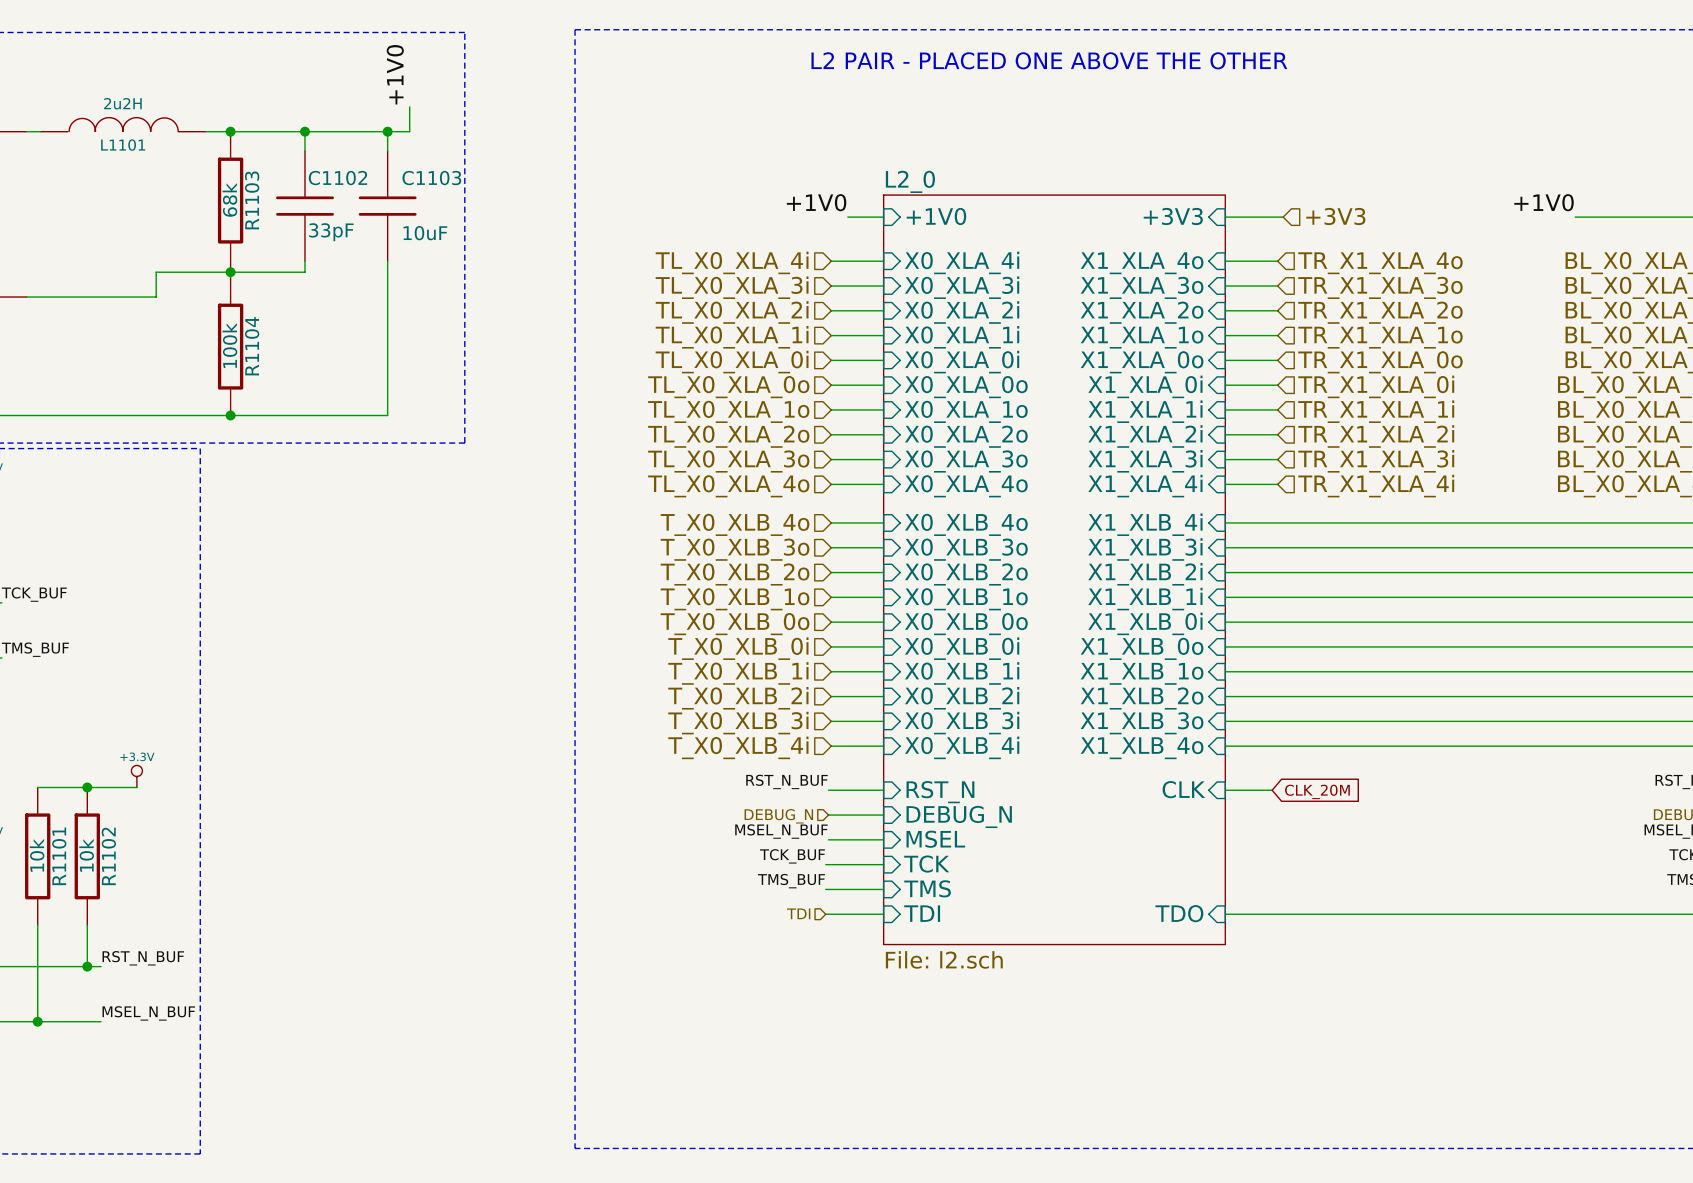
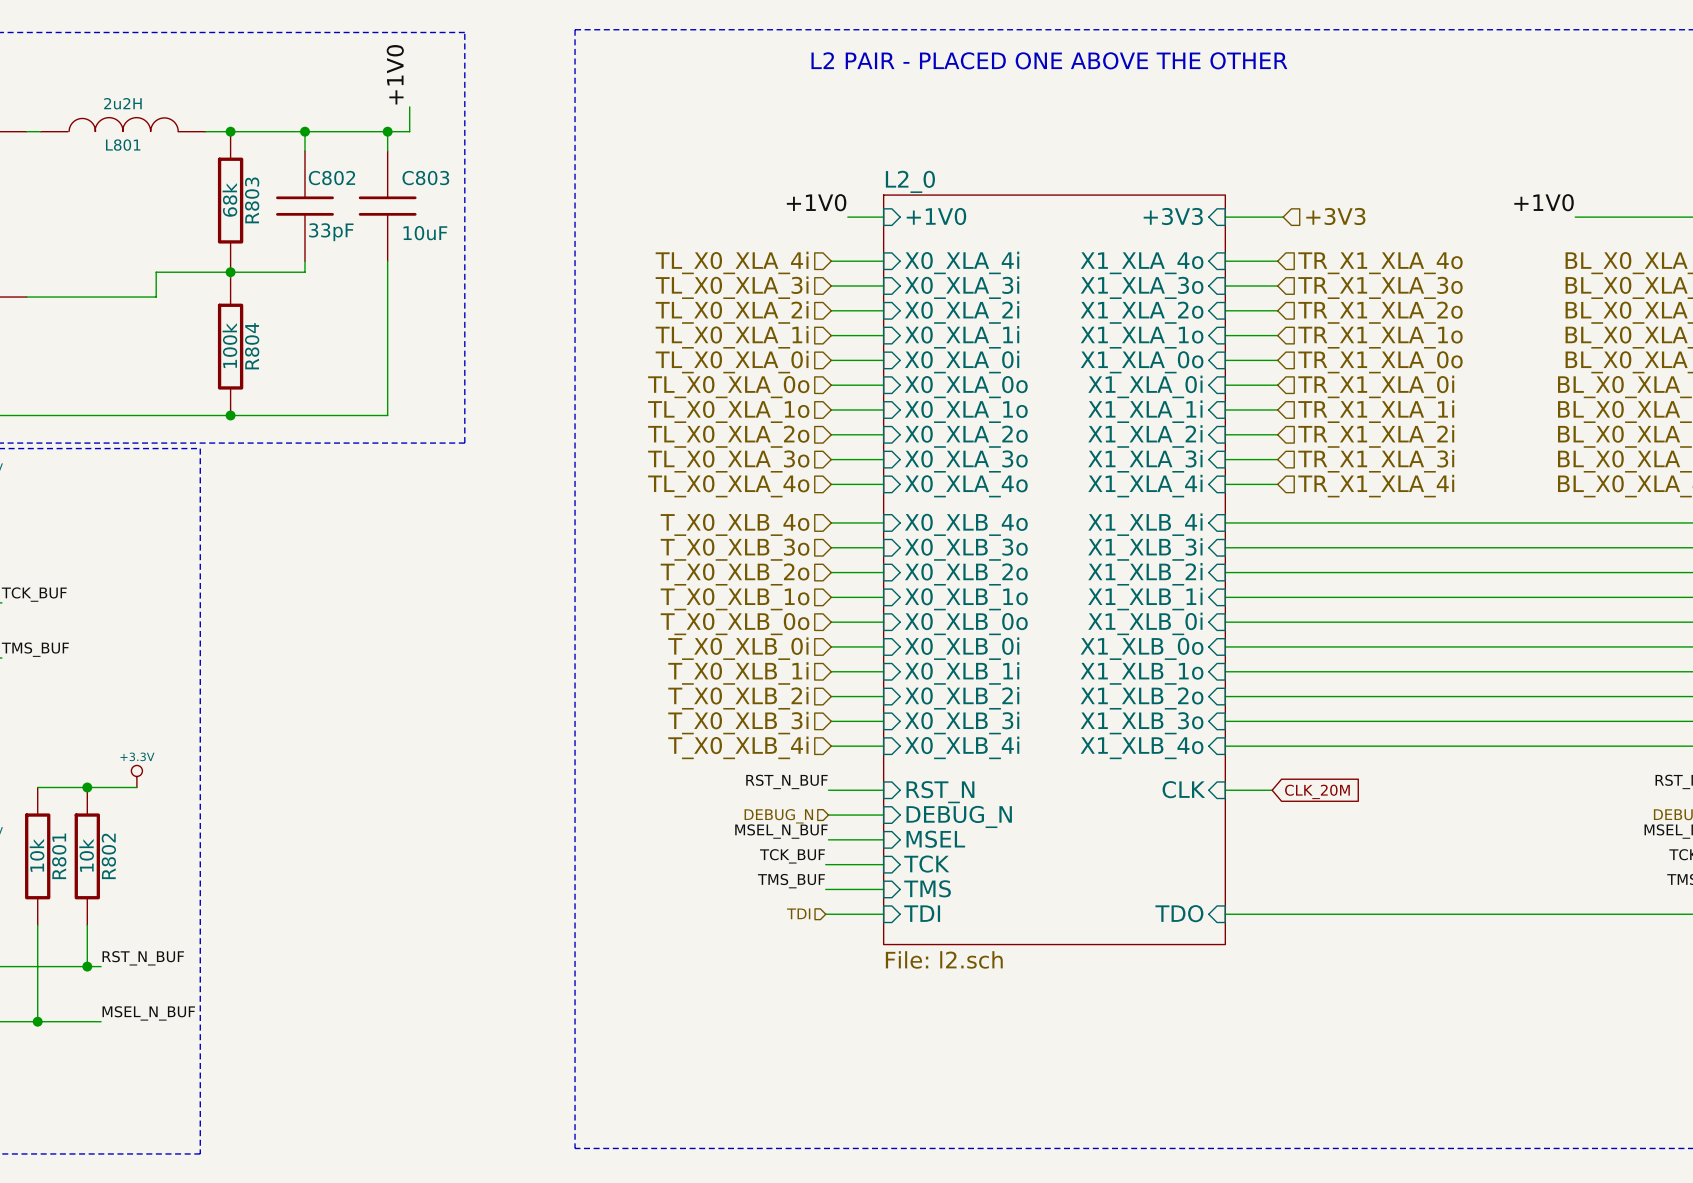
L1101 name: L1101 (123, 145) -> L801 (123, 145)
C1102 name: C1102 (337, 178) -> C802 (331, 178)
C1103 name: C1103 (431, 178) -> C803 (425, 178)
R1103 name: R1103 (252, 200) -> R803 (252, 200)
R1104 name: R1104 (252, 346) -> R804 (252, 346)
R1101 name: R1101 (59, 856) -> R801 (59, 856)
R1102 name: R1102 (108, 856) -> R802 (108, 856)

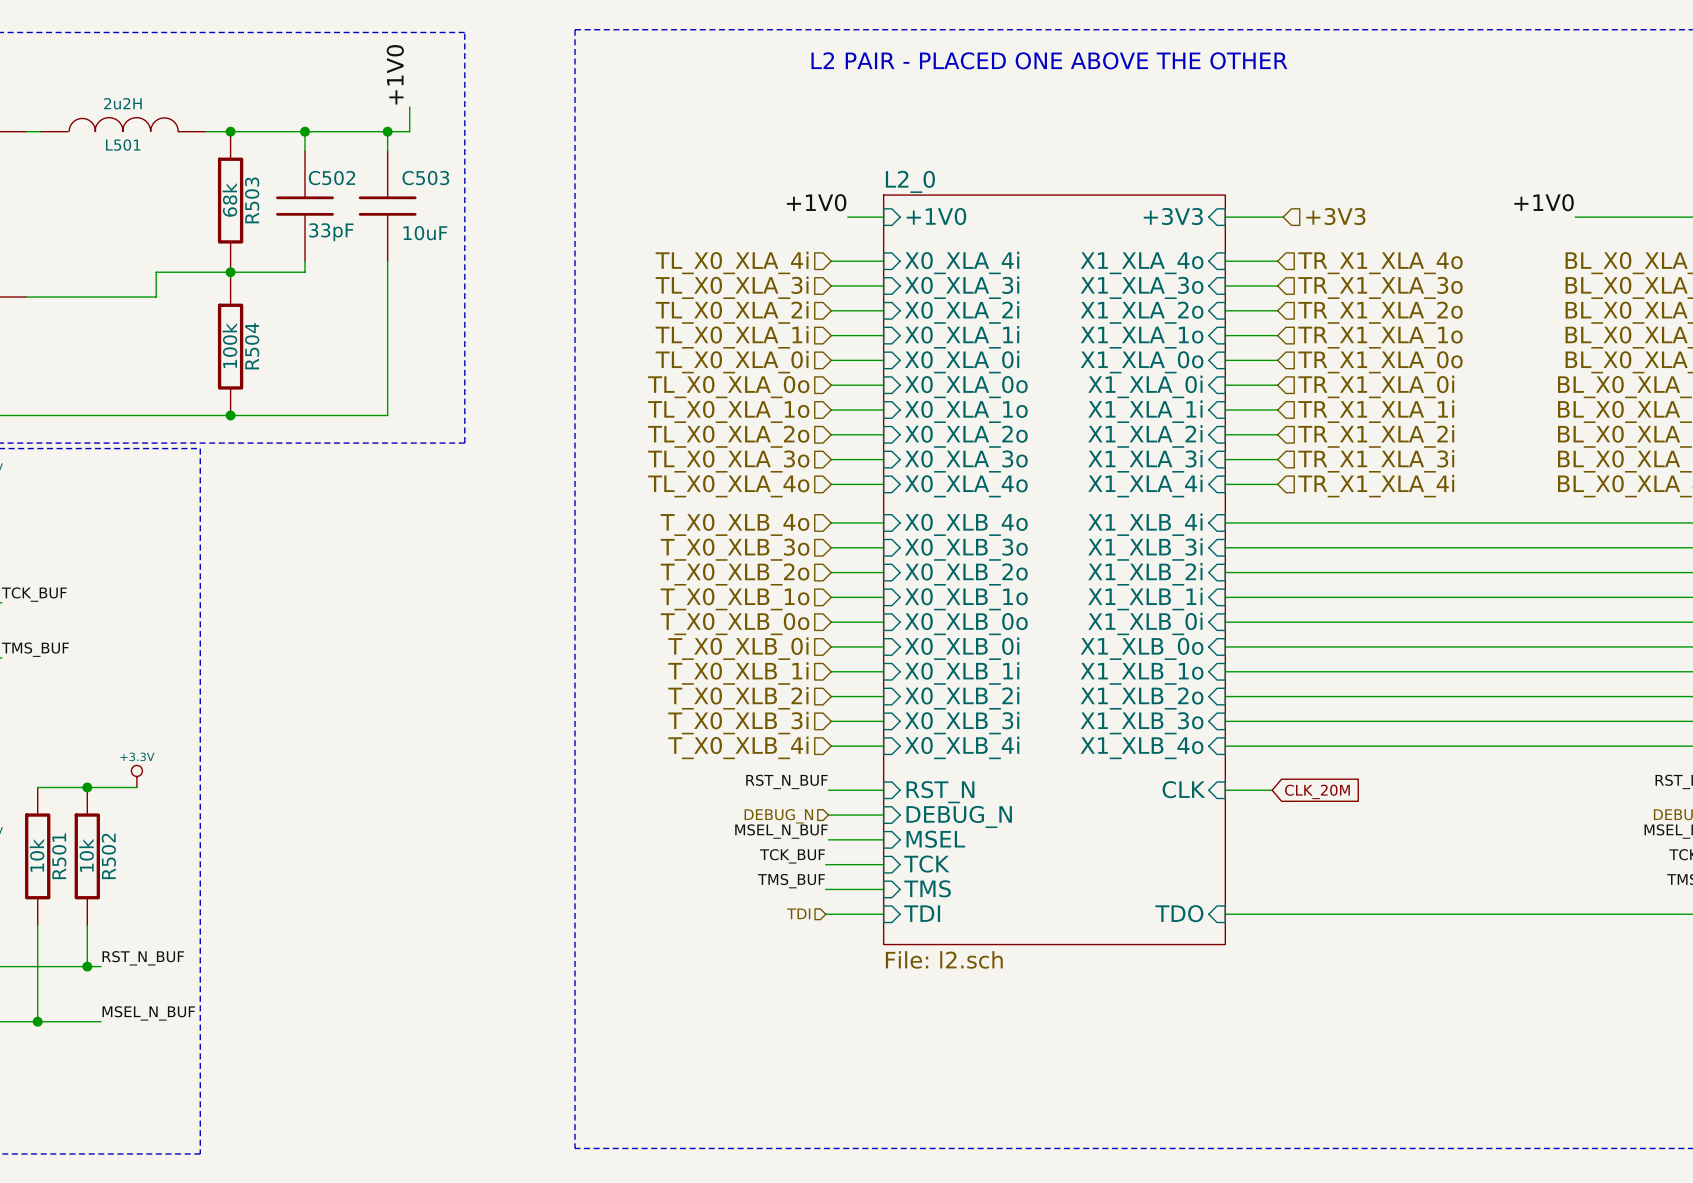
L801 name: L801 (123, 145) -> L501 (123, 145)
C802 name: C802 (331, 178) -> C502 (331, 178)
C803 name: C803 (425, 178) -> C503 (425, 178)
R803 name: R803 (252, 200) -> R503 (252, 200)
R804 name: R804 (252, 346) -> R504 (252, 346)
R801 name: R801 (59, 856) -> R501 (59, 856)
R802 name: R802 (108, 856) -> R502 (108, 856)

